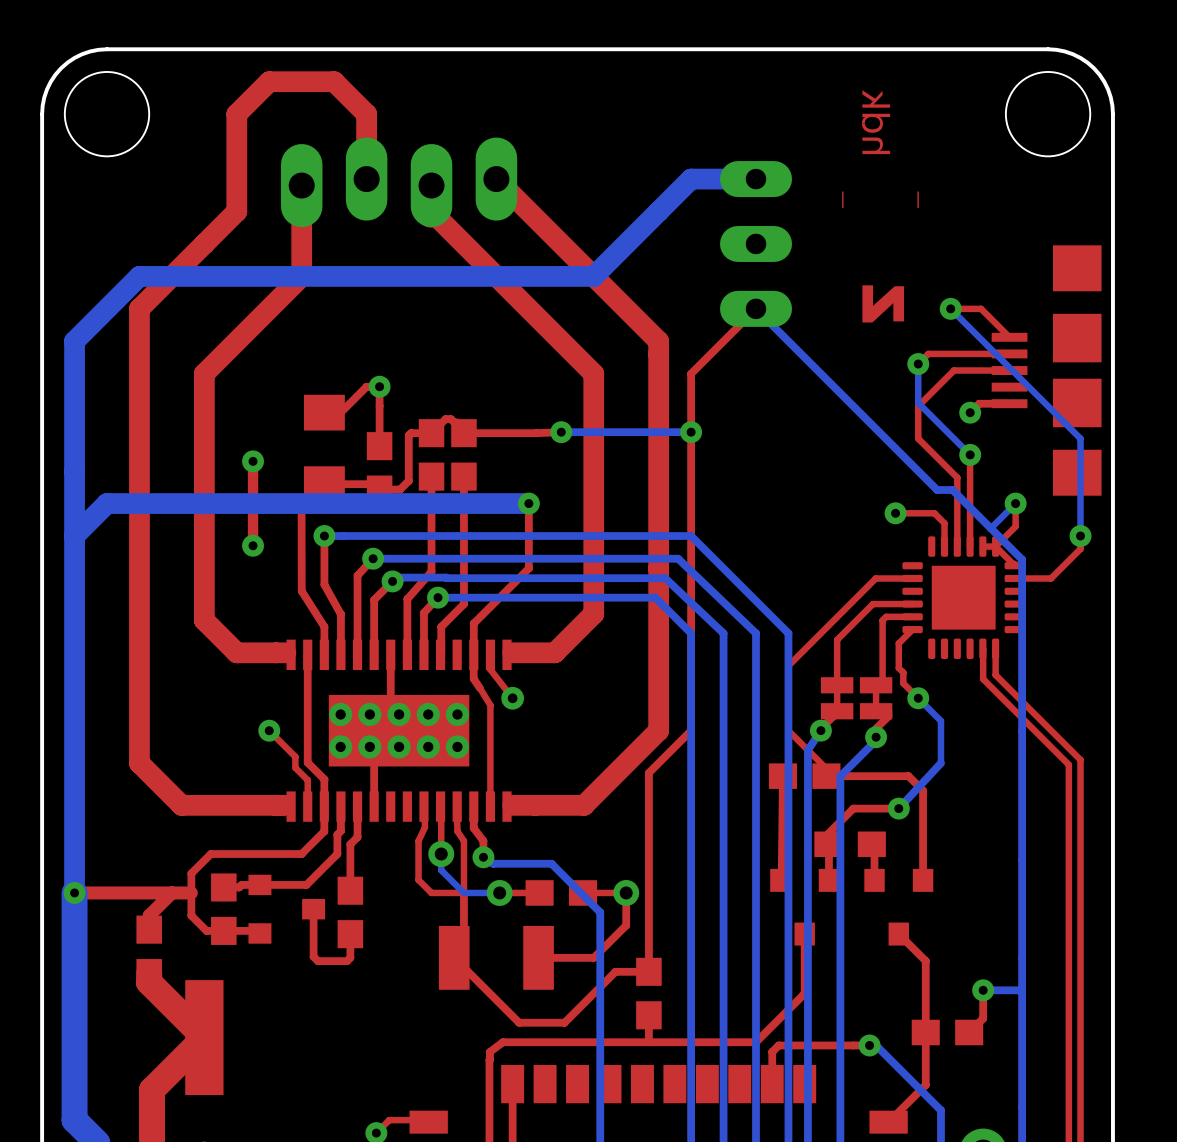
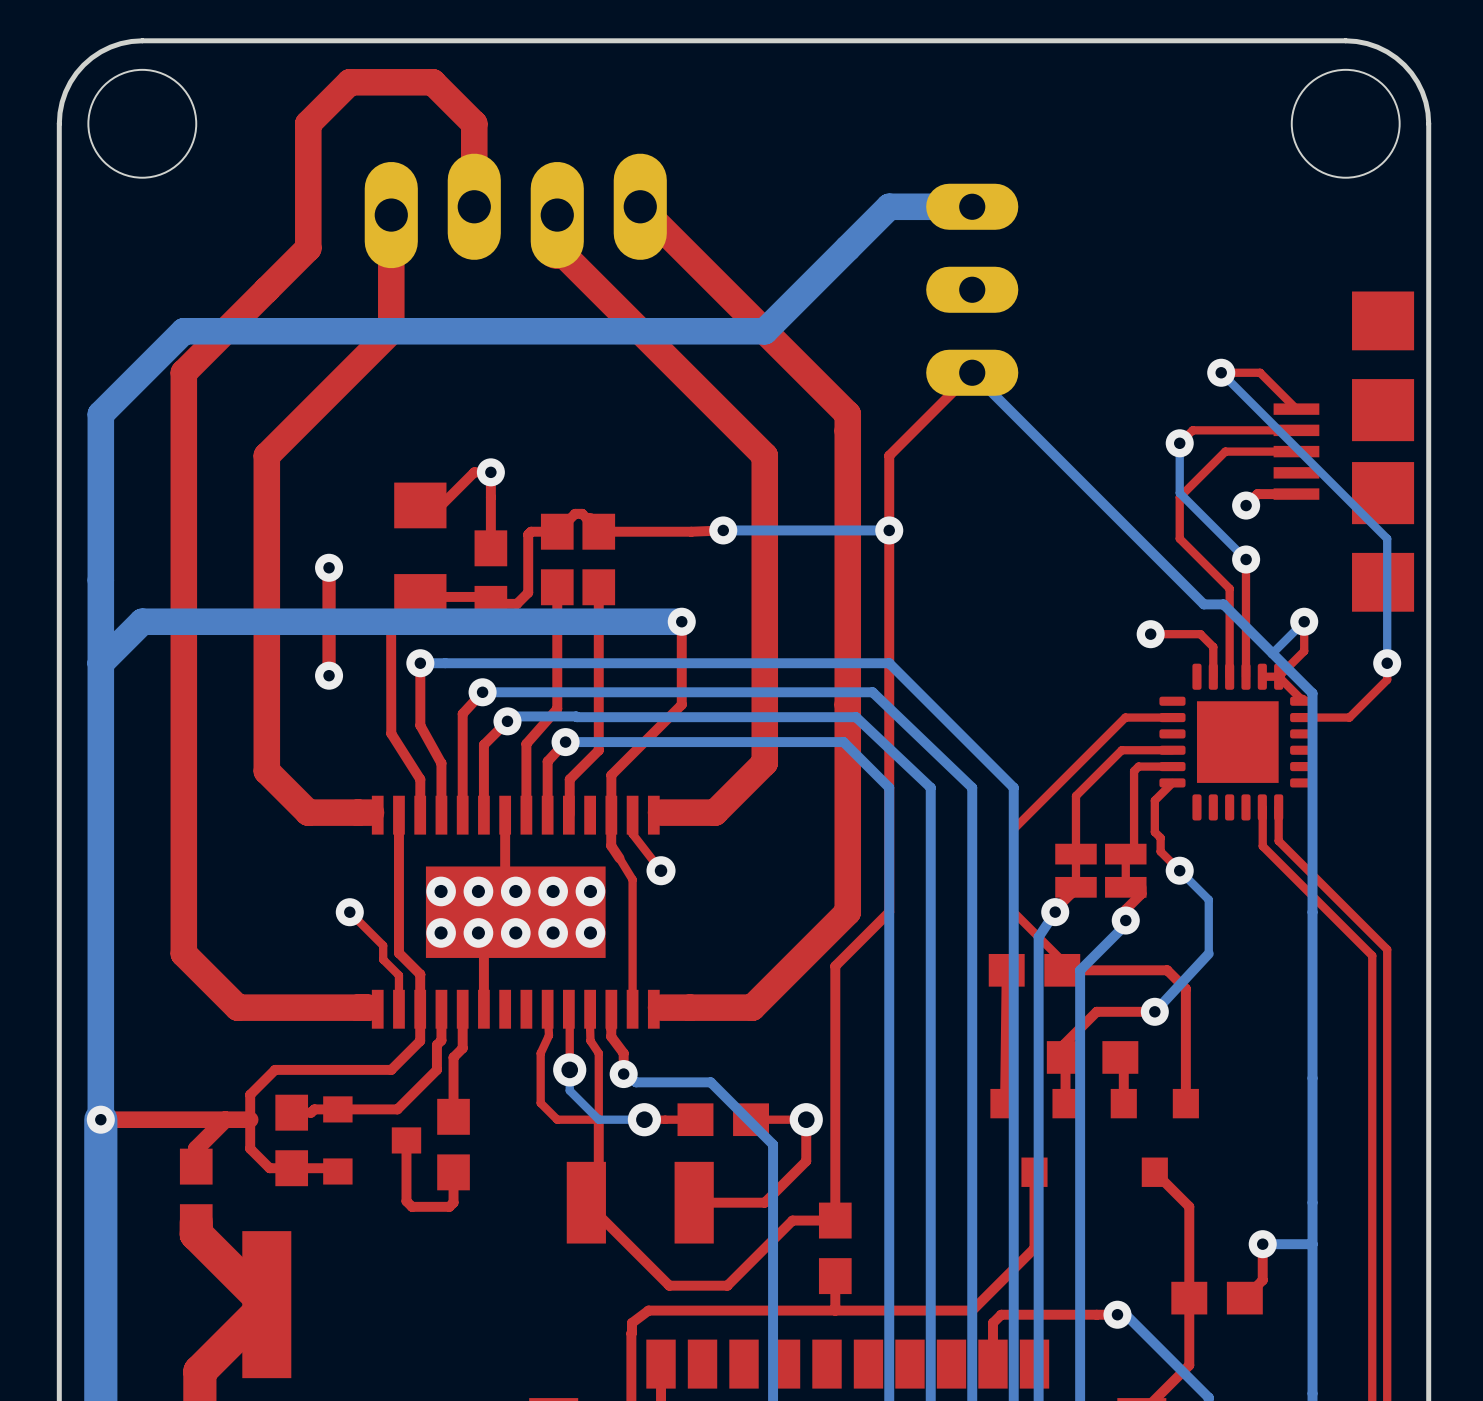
drawing: [842, 90, 919, 323] -> none

